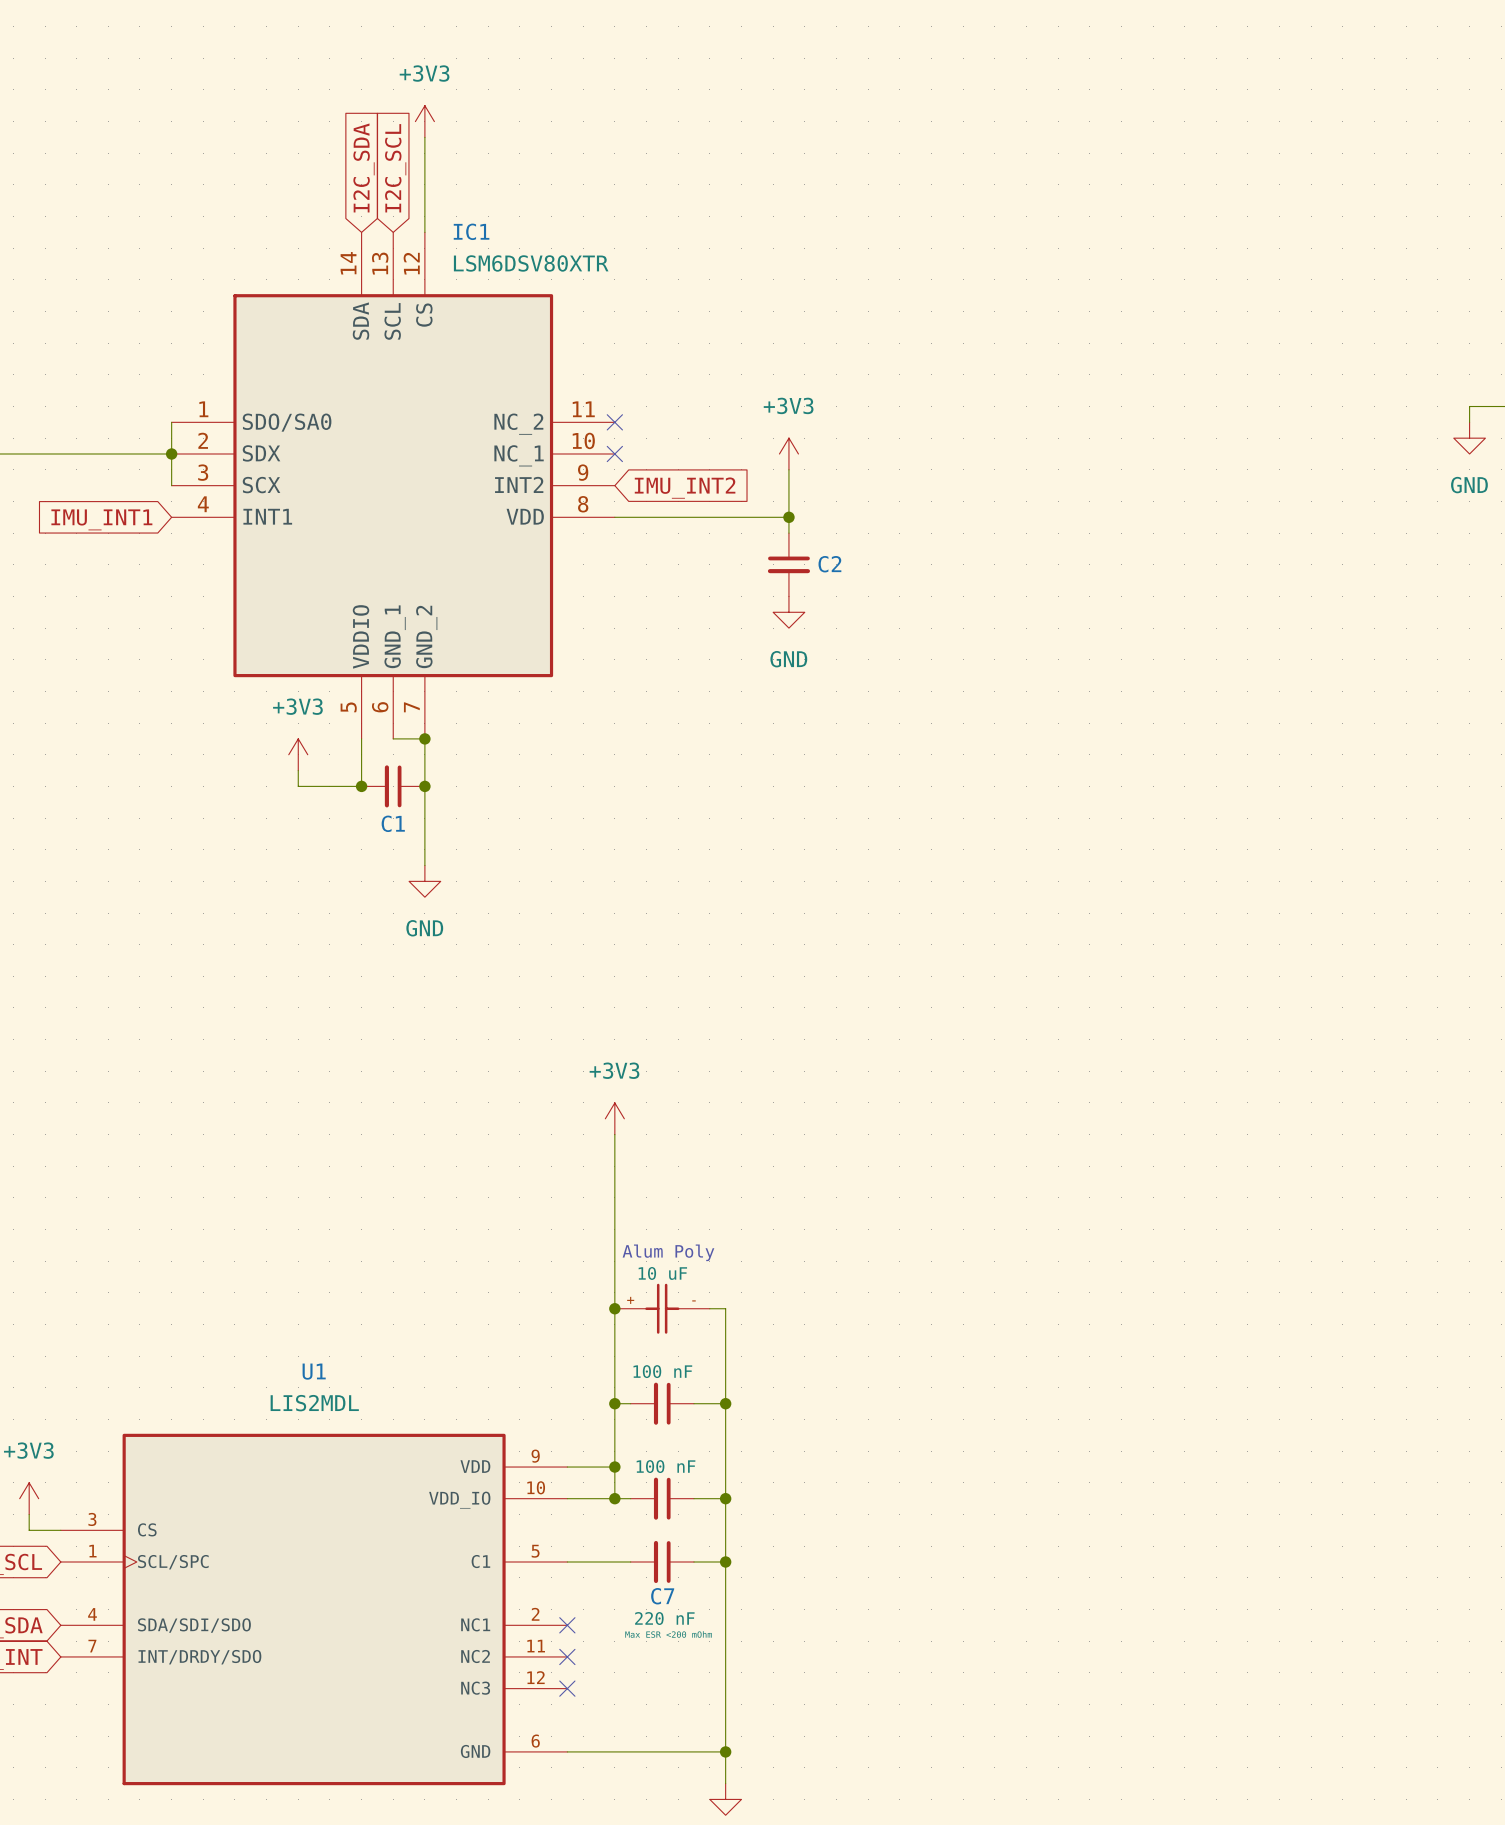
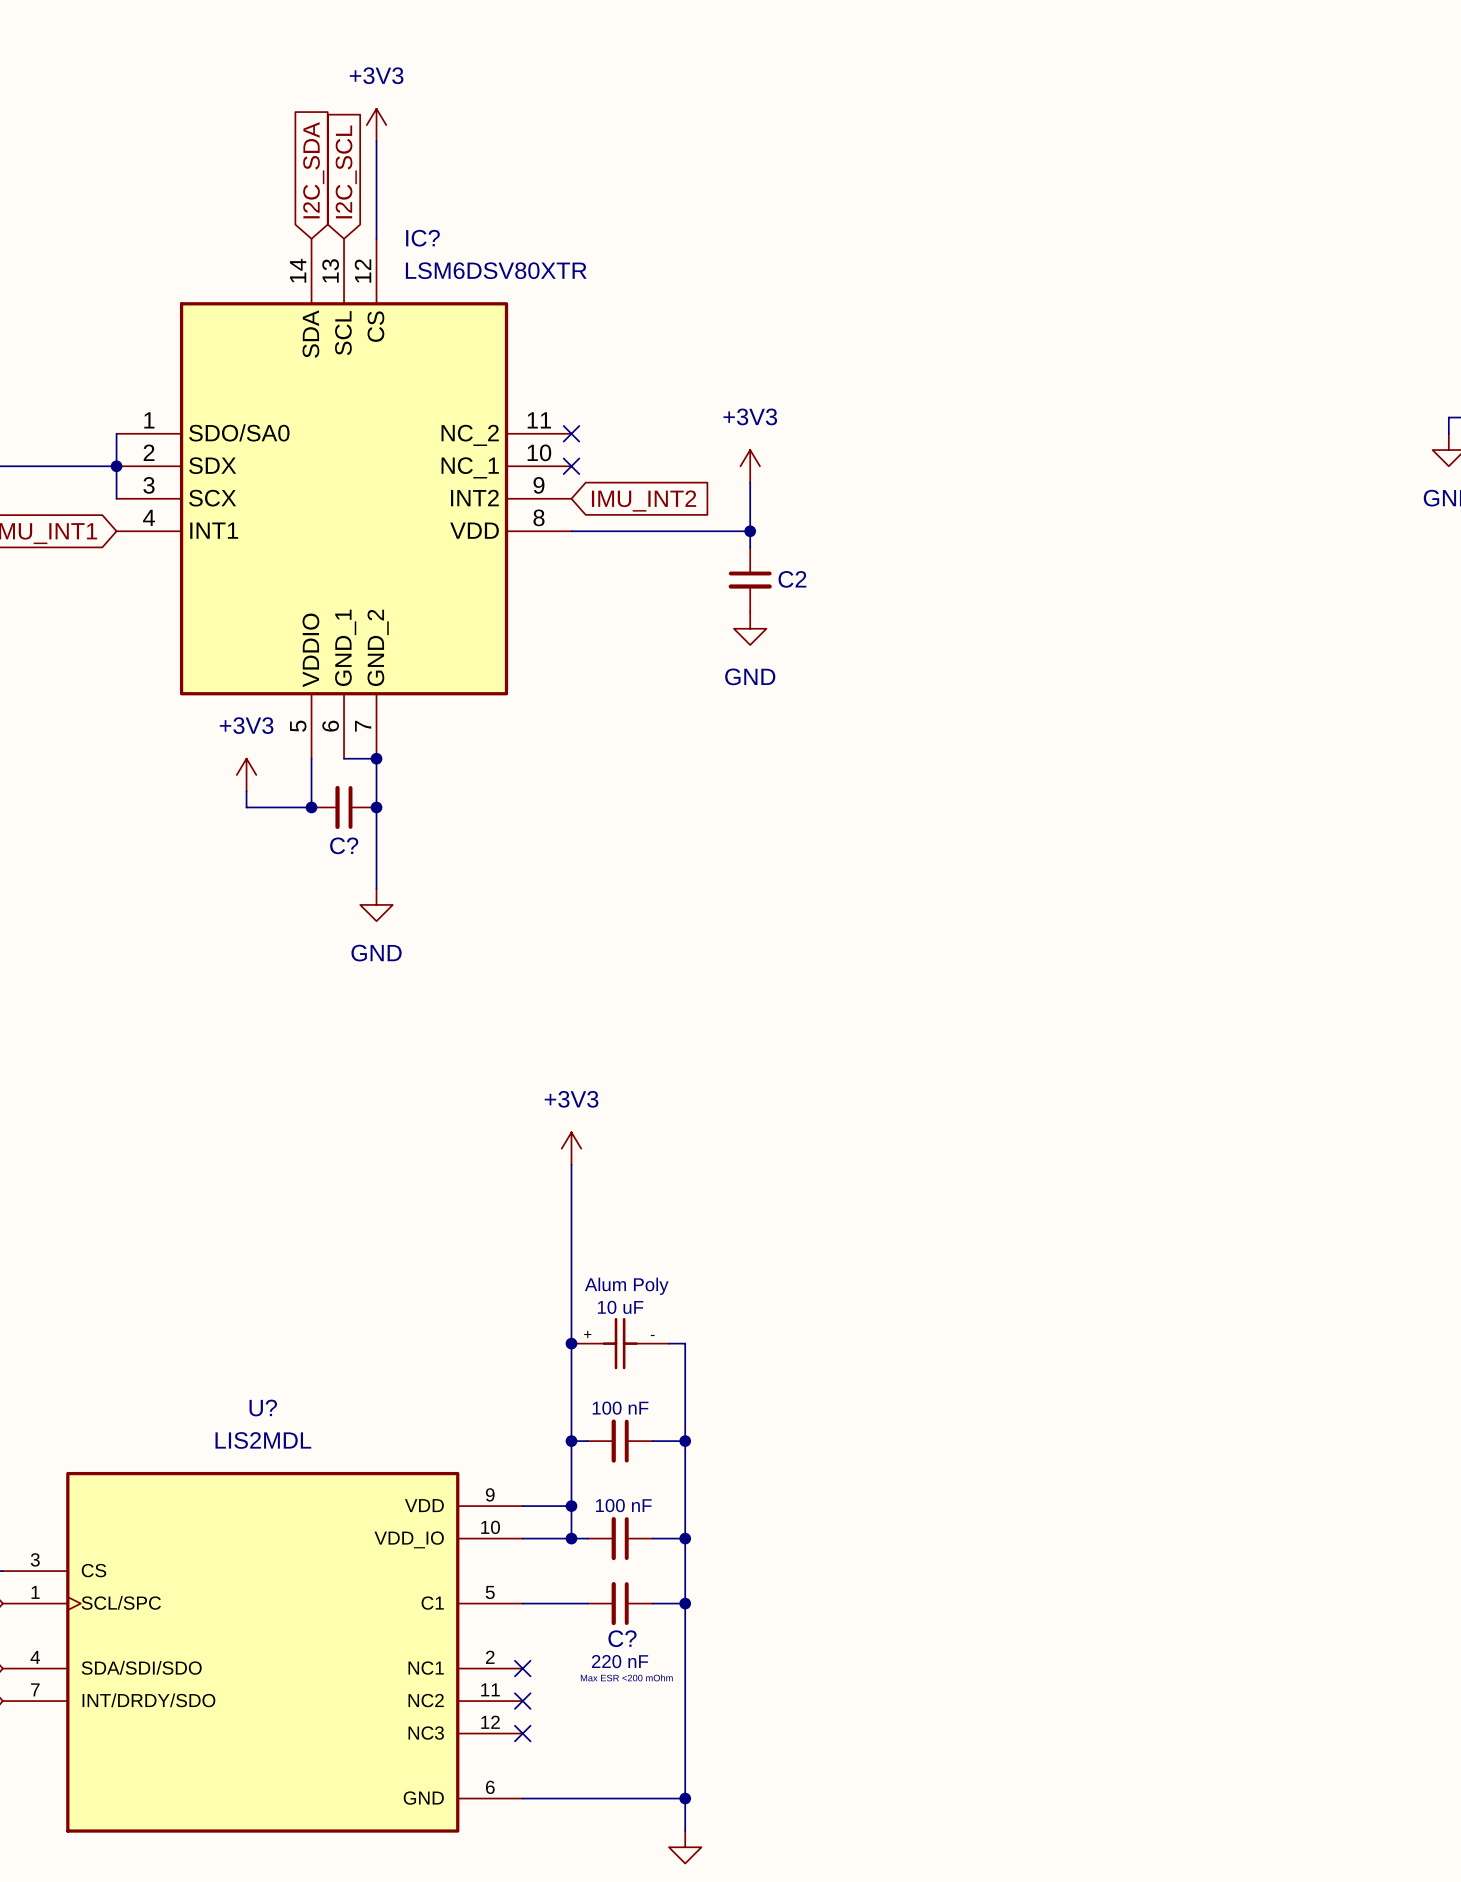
IC1 name: IC1 (471, 231) -> IC? (422, 238)
C1 name: C1 (393, 823) -> C? (344, 845)
U1 name: U1 (314, 1371) -> U? (263, 1407)
C7 name: C7 (662, 1596) -> C? (622, 1638)

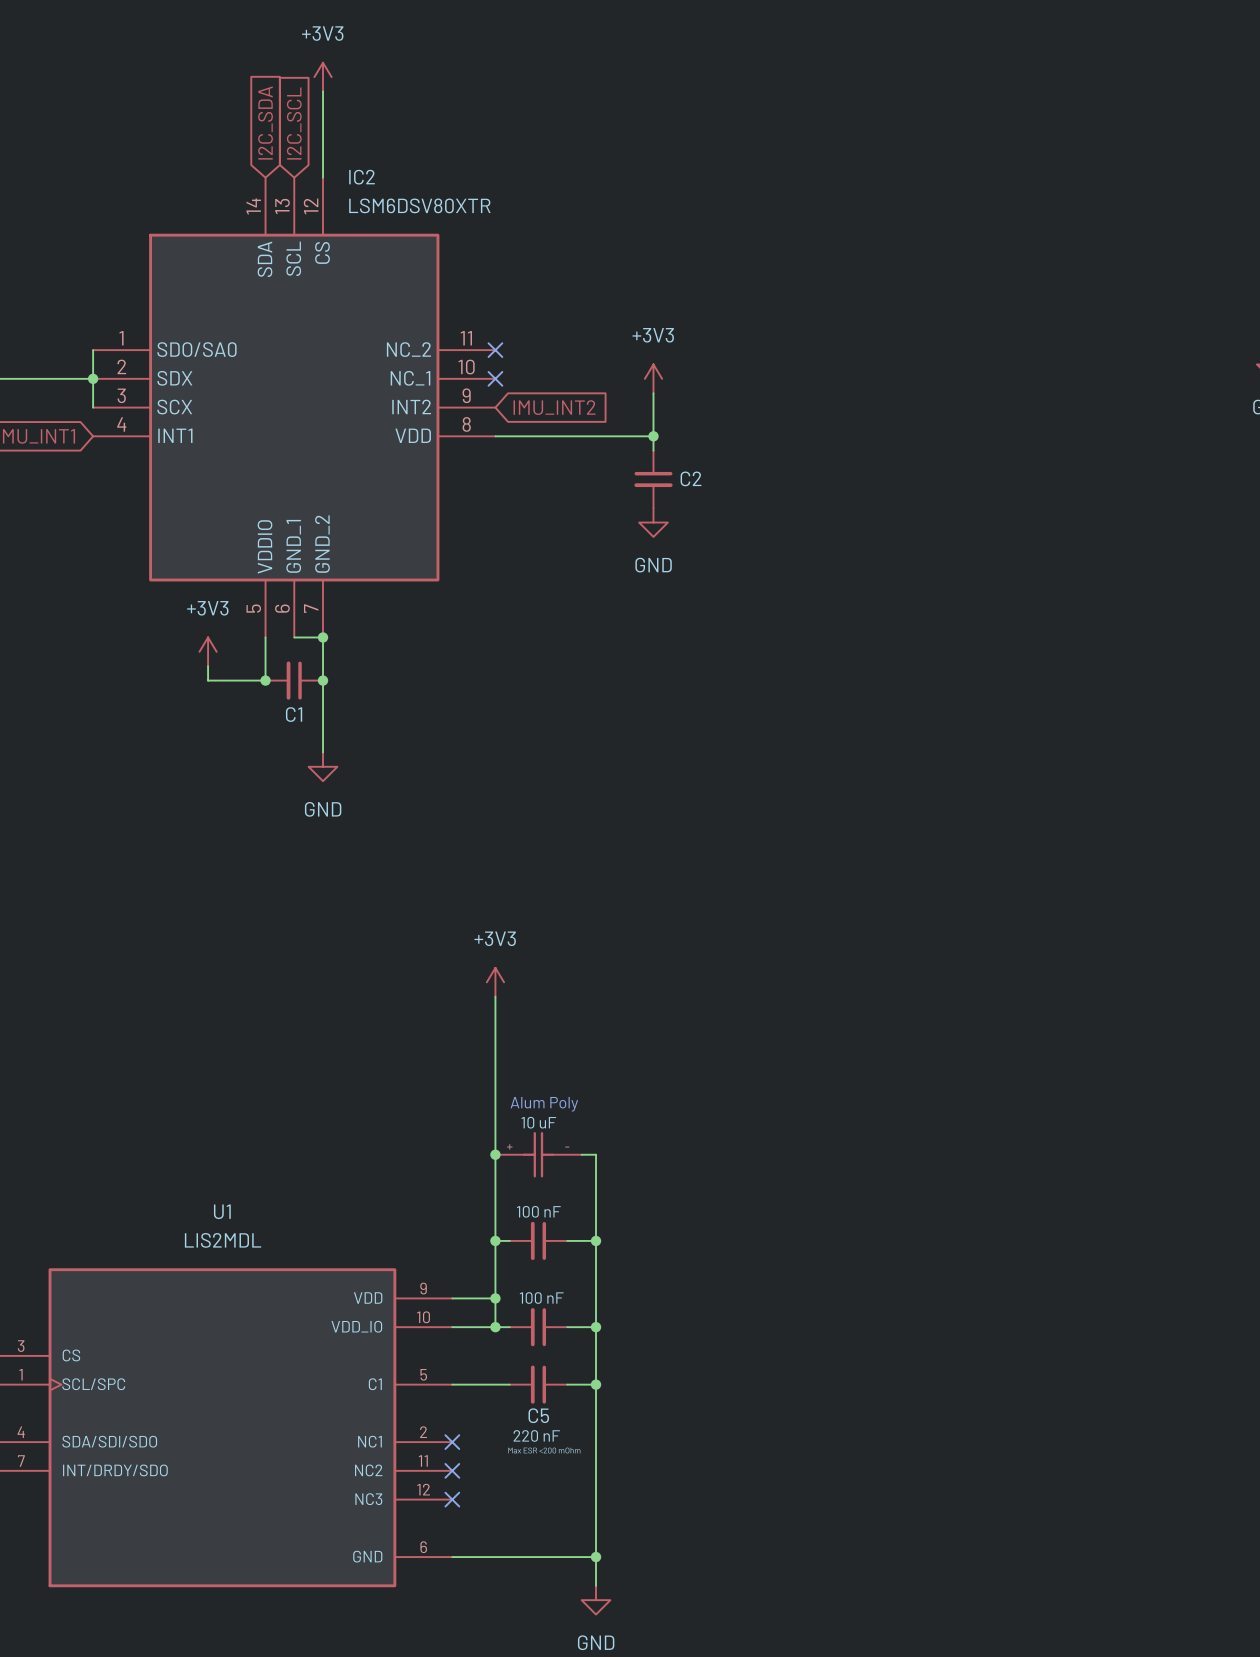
IC? name: IC? (422, 238) -> IC2 (362, 177)
C? name: C? (344, 845) -> C1 (294, 714)
U? name: U? (263, 1407) -> U1 (222, 1211)
C? name: C? (622, 1638) -> C5 (538, 1415)

